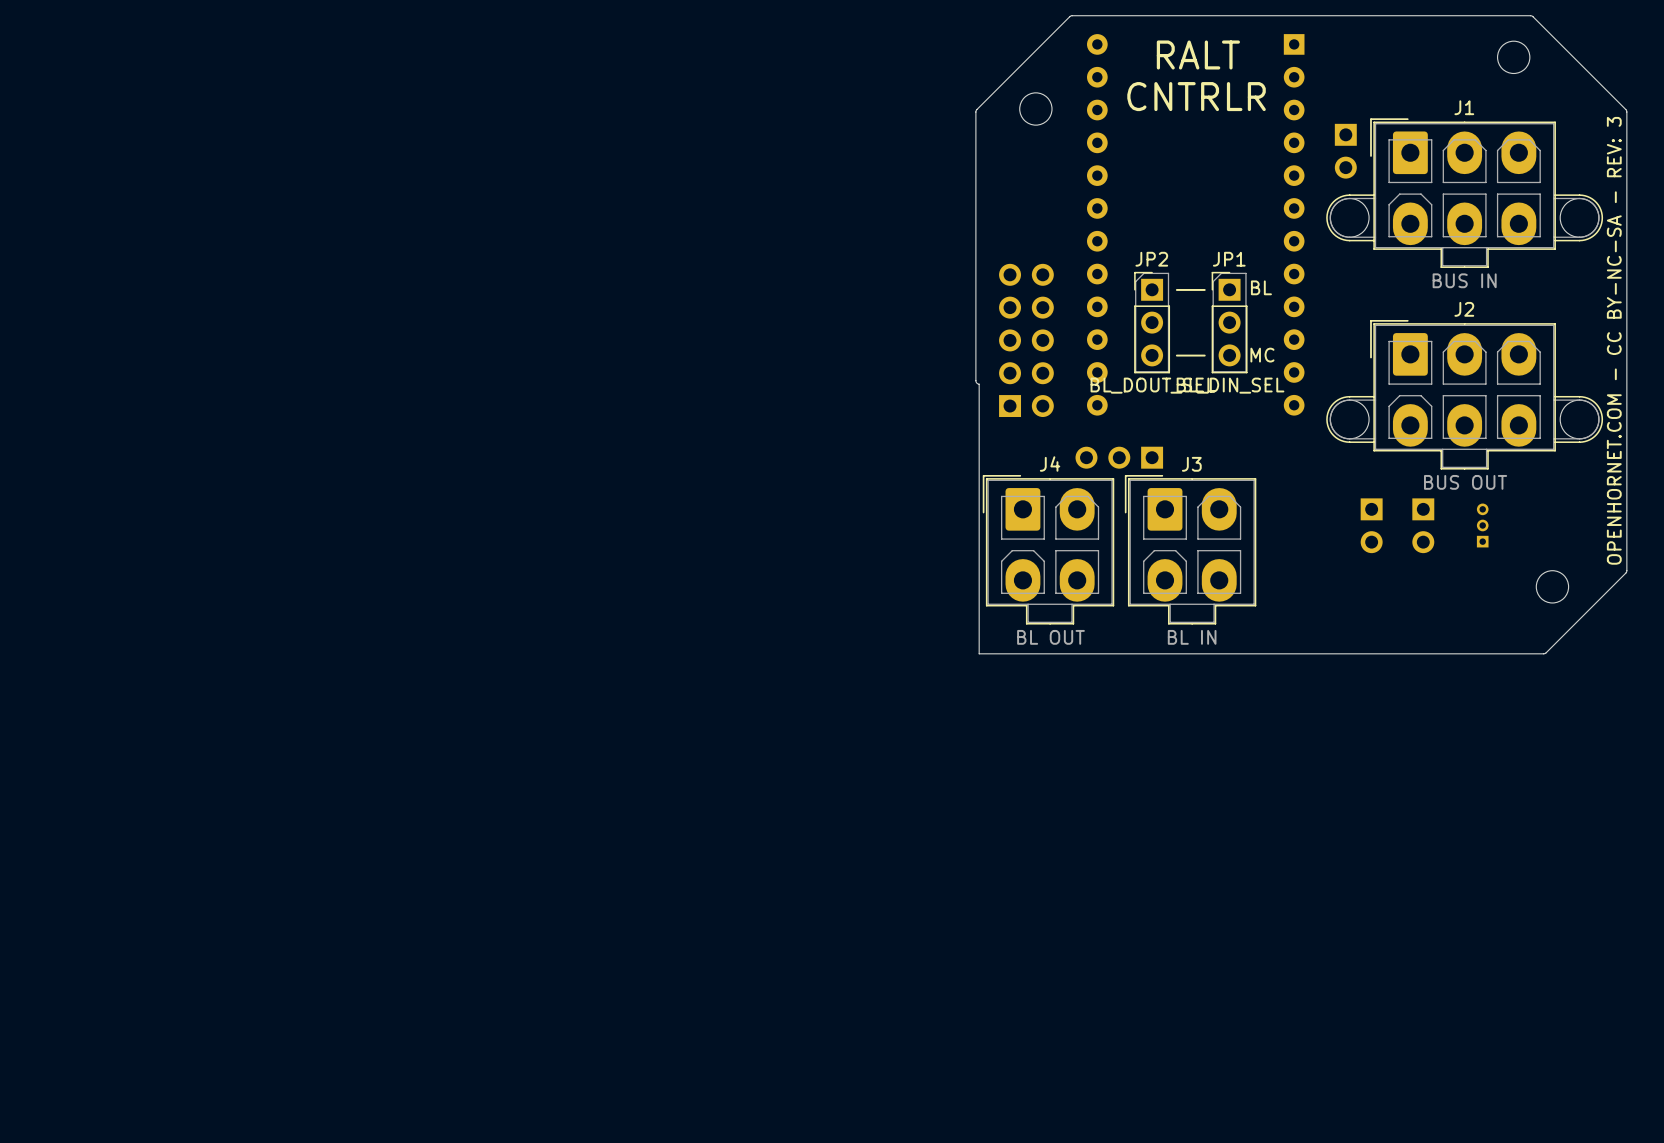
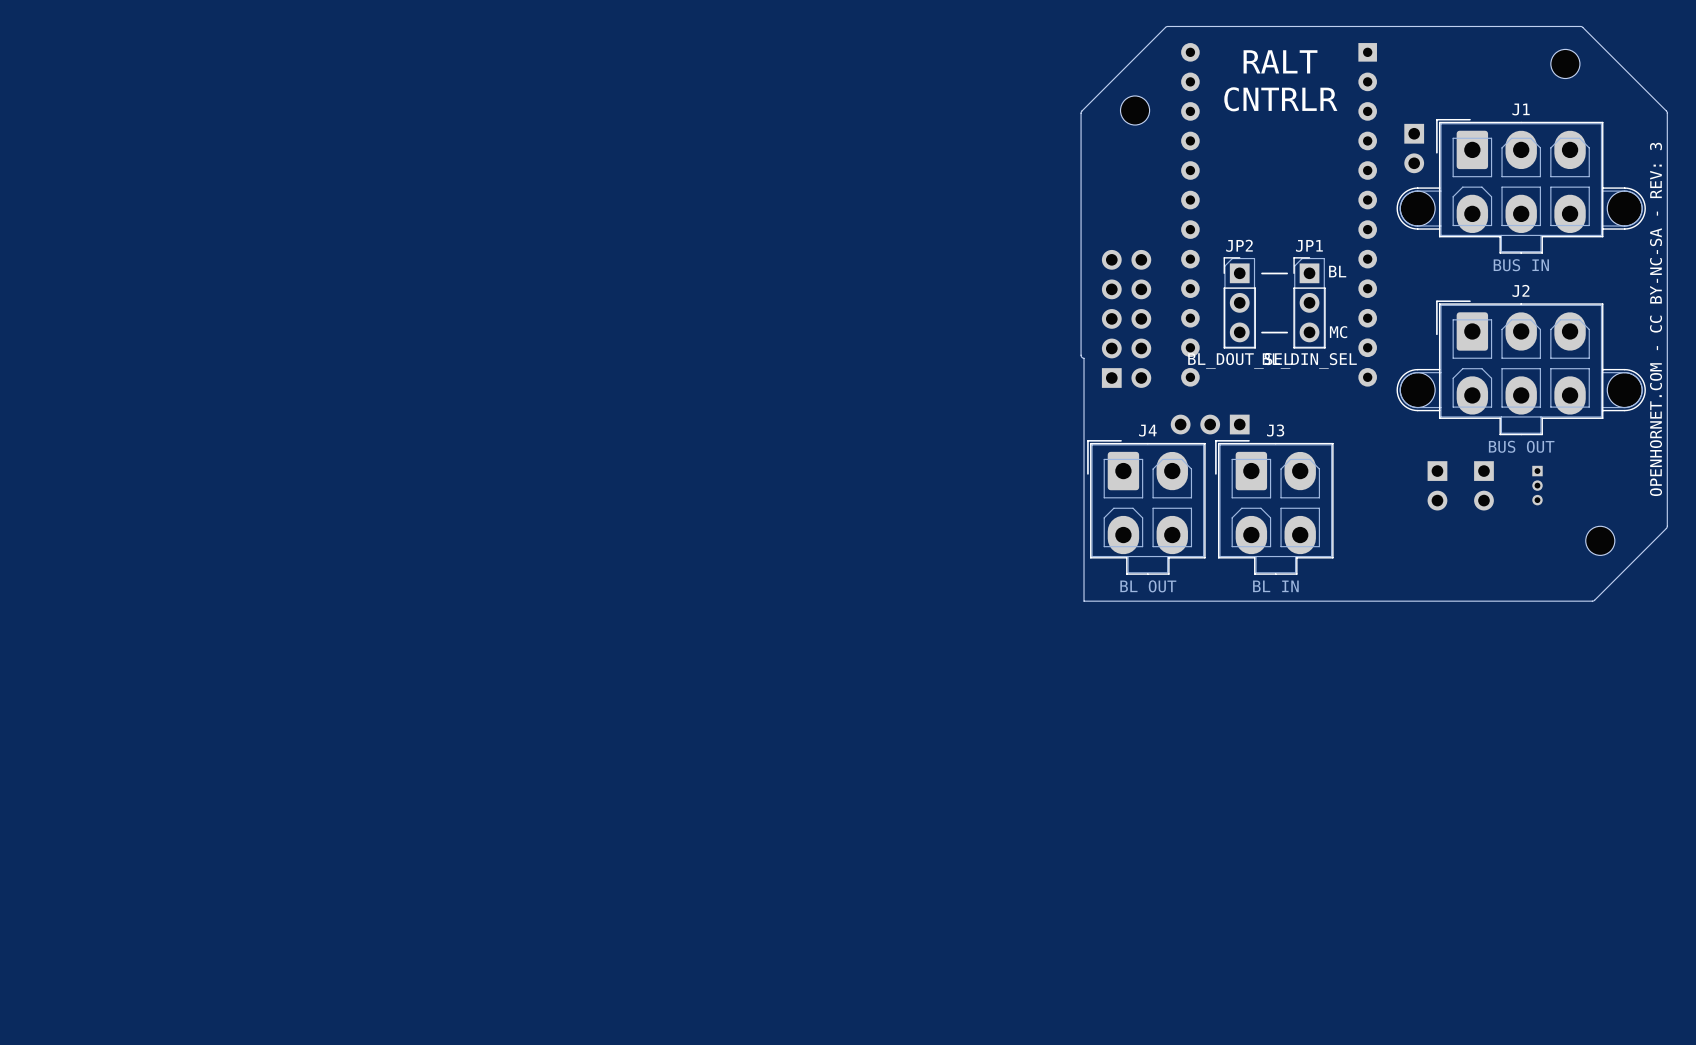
part rotation: 0° (1482, 525) -> 180° (1537, 485)

